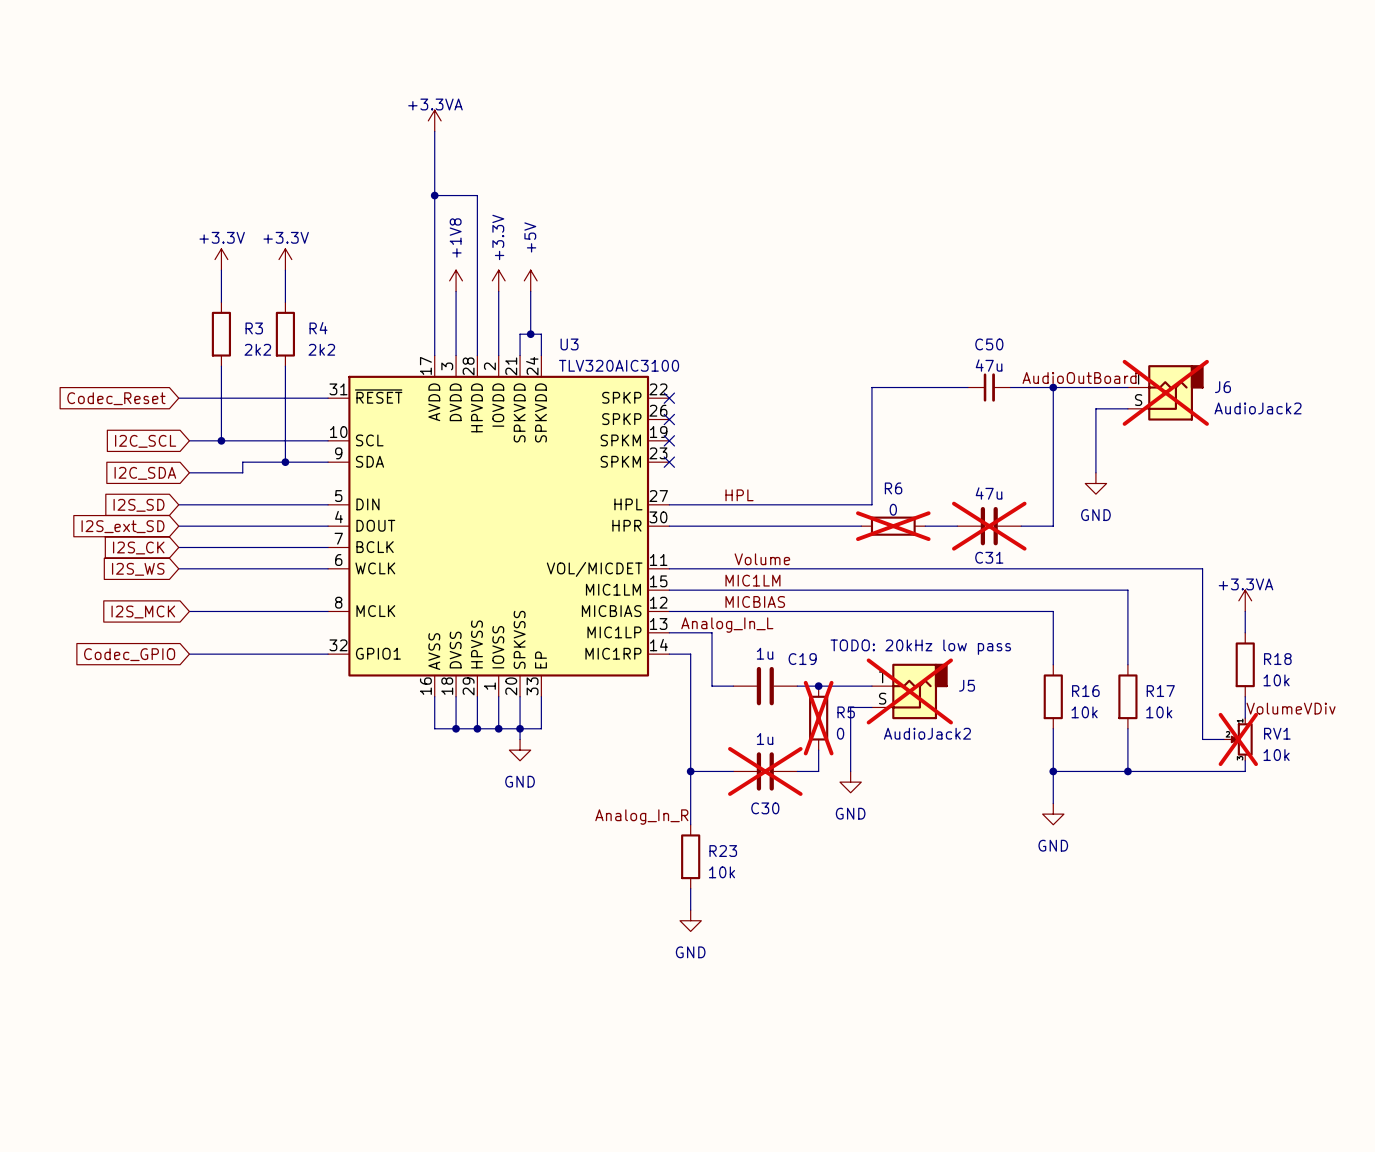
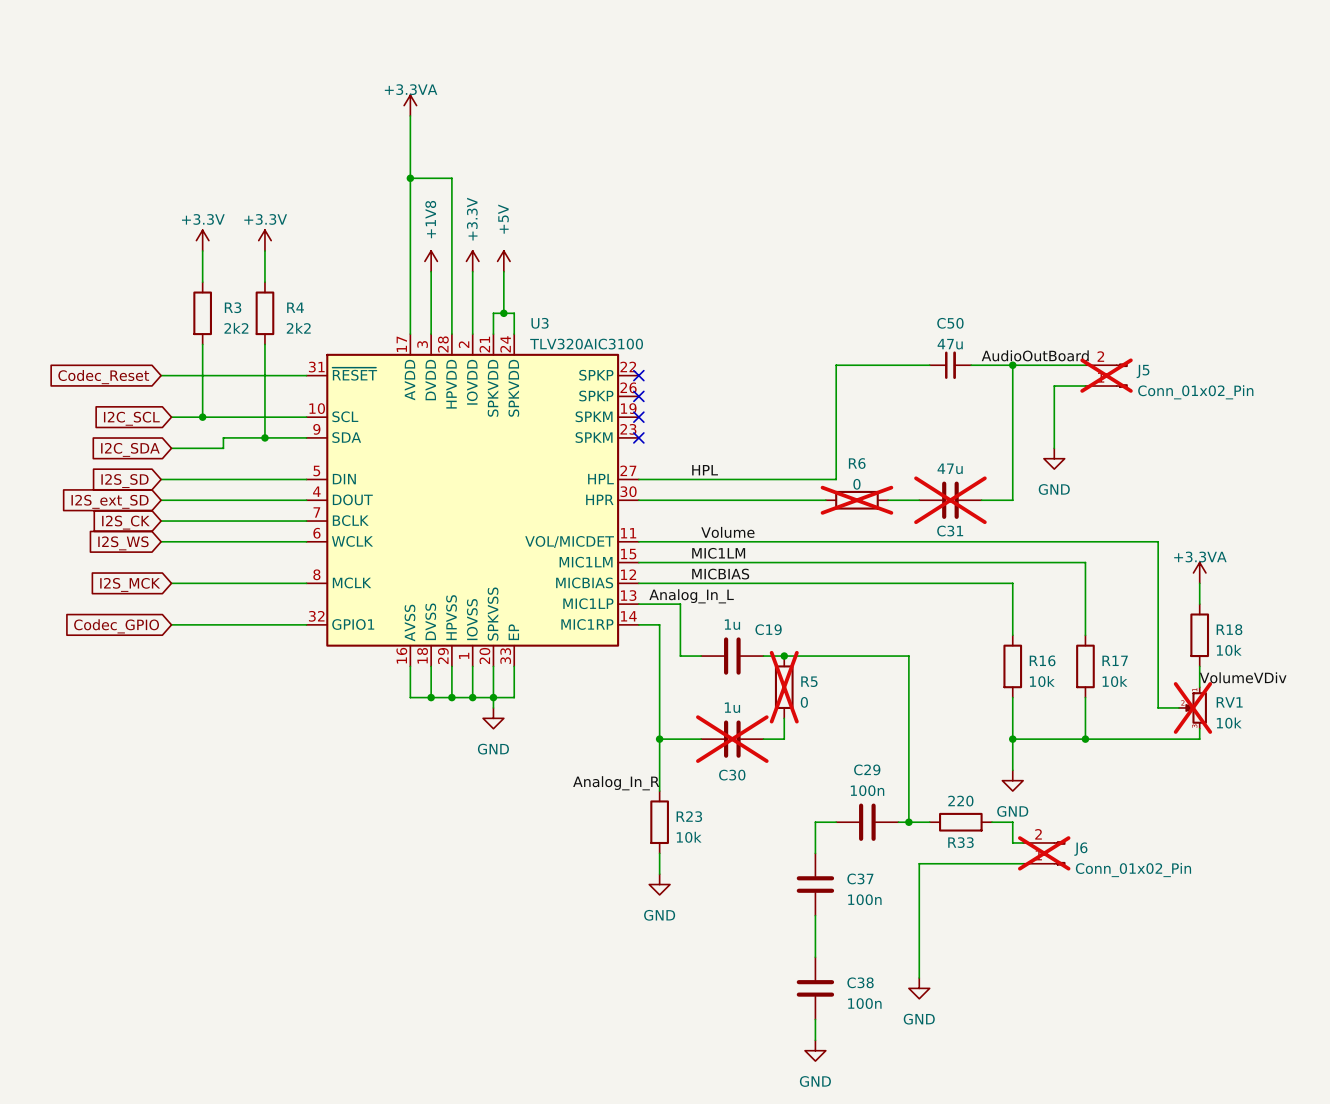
J6 symbol: [1127, 365, 1204, 421] -> [1023, 841, 1066, 866]
J6 value: AudioJack2 (1258, 408) -> Conn_01x02_Pin (1133, 870)
text: TODO: 20kHz low pass (920, 647) -> none
J5 symbol: [871, 663, 948, 720] -> [1085, 363, 1128, 388]
wire: none -> (836, 656) (908, 656) (908, 822)
wire: (871, 707) (850, 707) (850, 771) -> none
J5 value: AudioJack2 (927, 733) -> Conn_01x02_Pin (1195, 392)
power symbol: GND (850, 782) -> none
wire: none -> (836, 822) (815, 822) (815, 853)
C29: none -> 100n (867, 822)
wire: none -> (898, 822) (929, 822)
junction: none -> (908, 822)
R33: none -> 220 (960, 822)
wire: none -> (991, 822) (1012, 822) (1012, 842) (1023, 842)
wire: none -> (1023, 863) (919, 863) (919, 978)
C37: none -> 100n (815, 884)
wire: none -> (815, 915) (815, 957)
C38: none -> 100n (815, 988)
power symbol: none -> GND (919, 988)
wire: none -> (815, 1019) (815, 1040)
power symbol: none -> GND (815, 1050)

